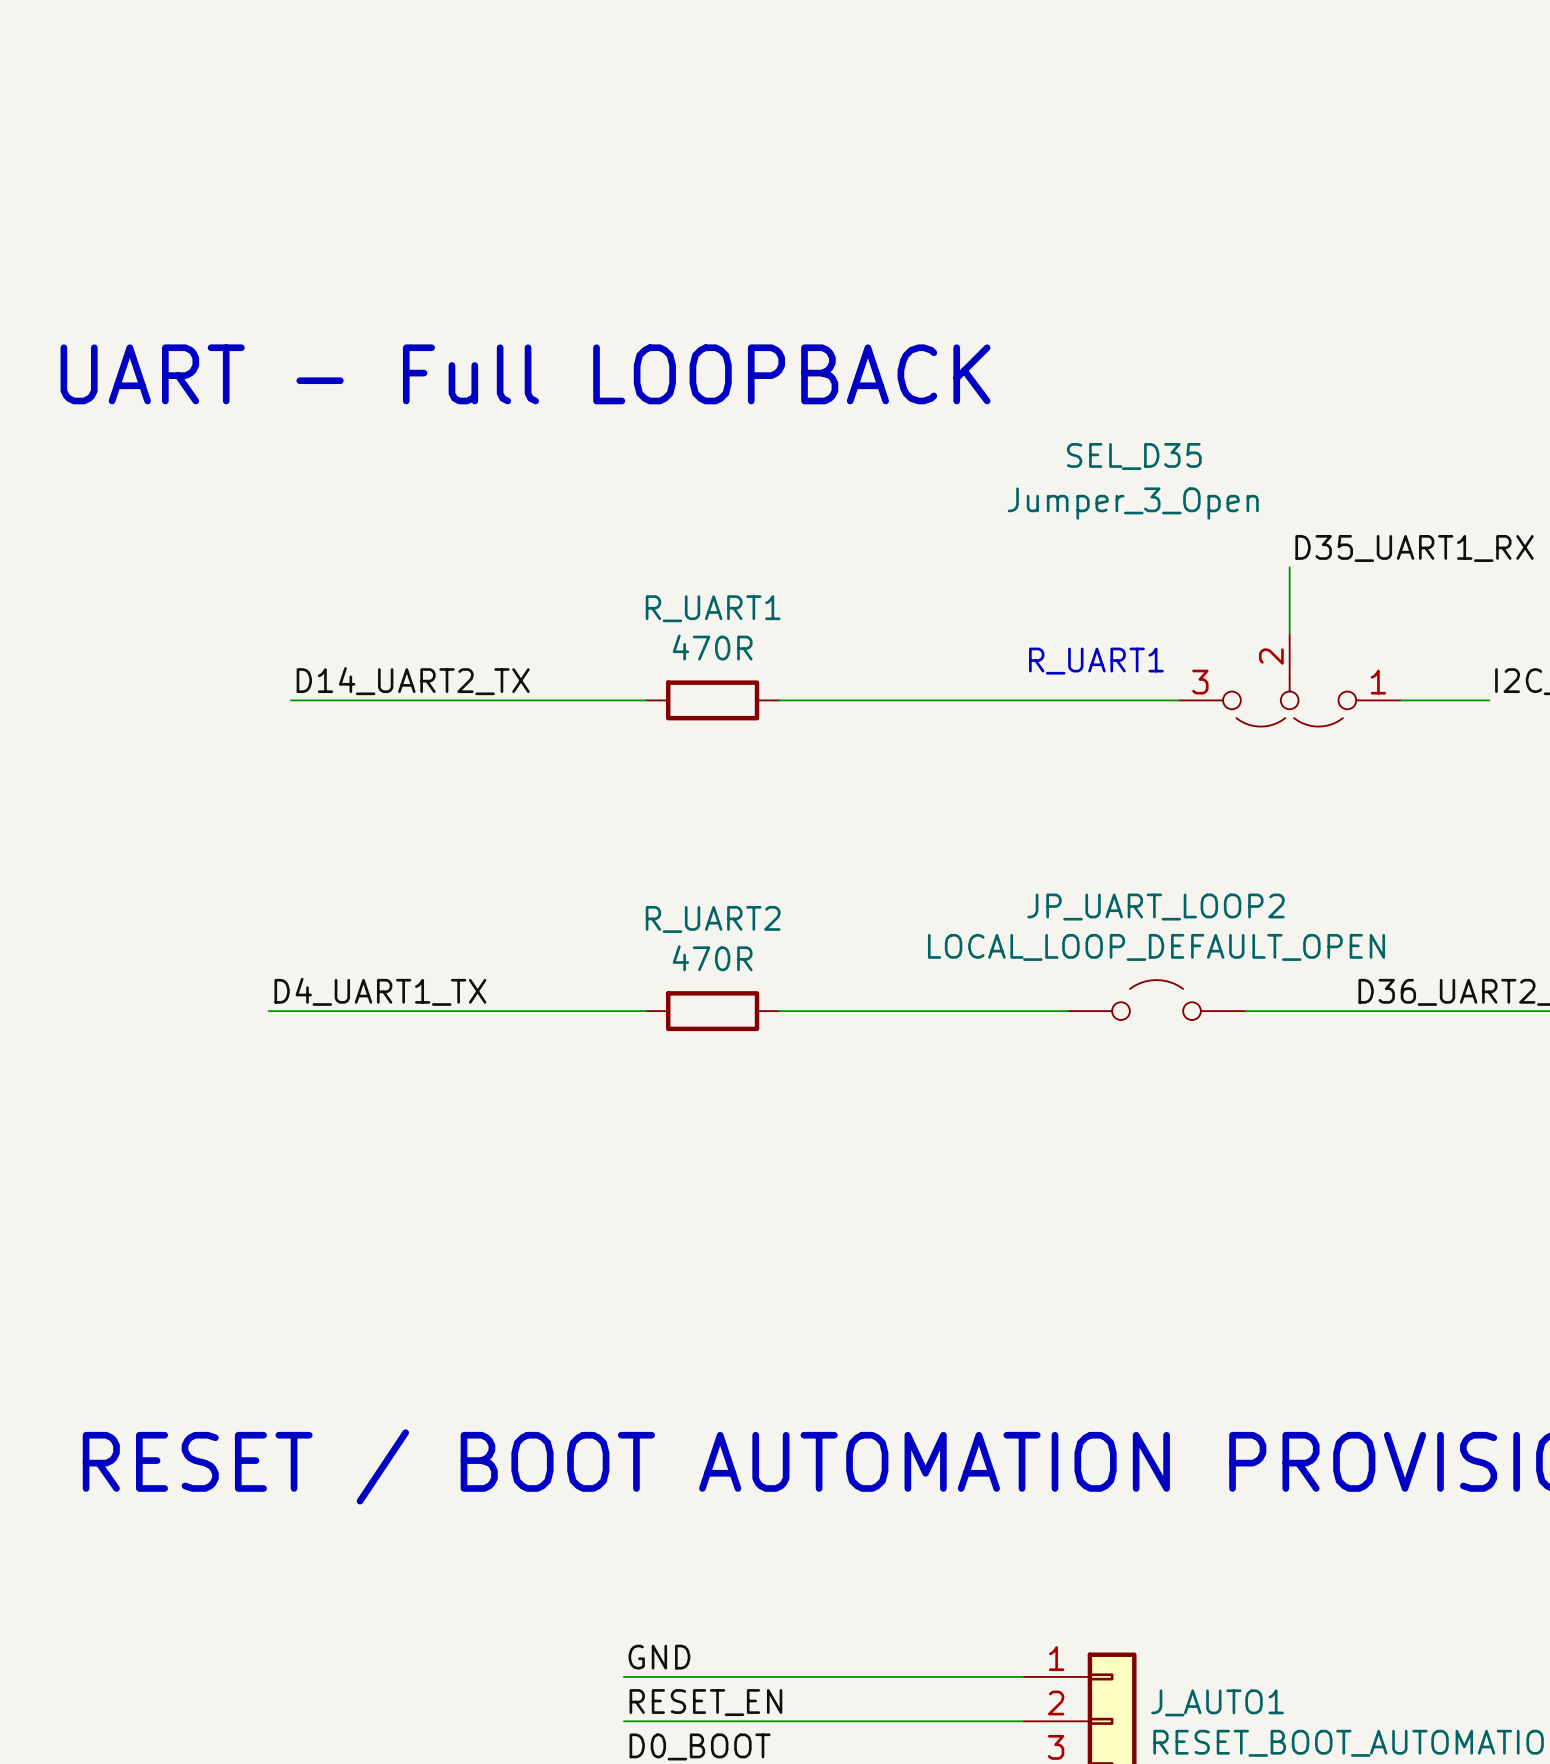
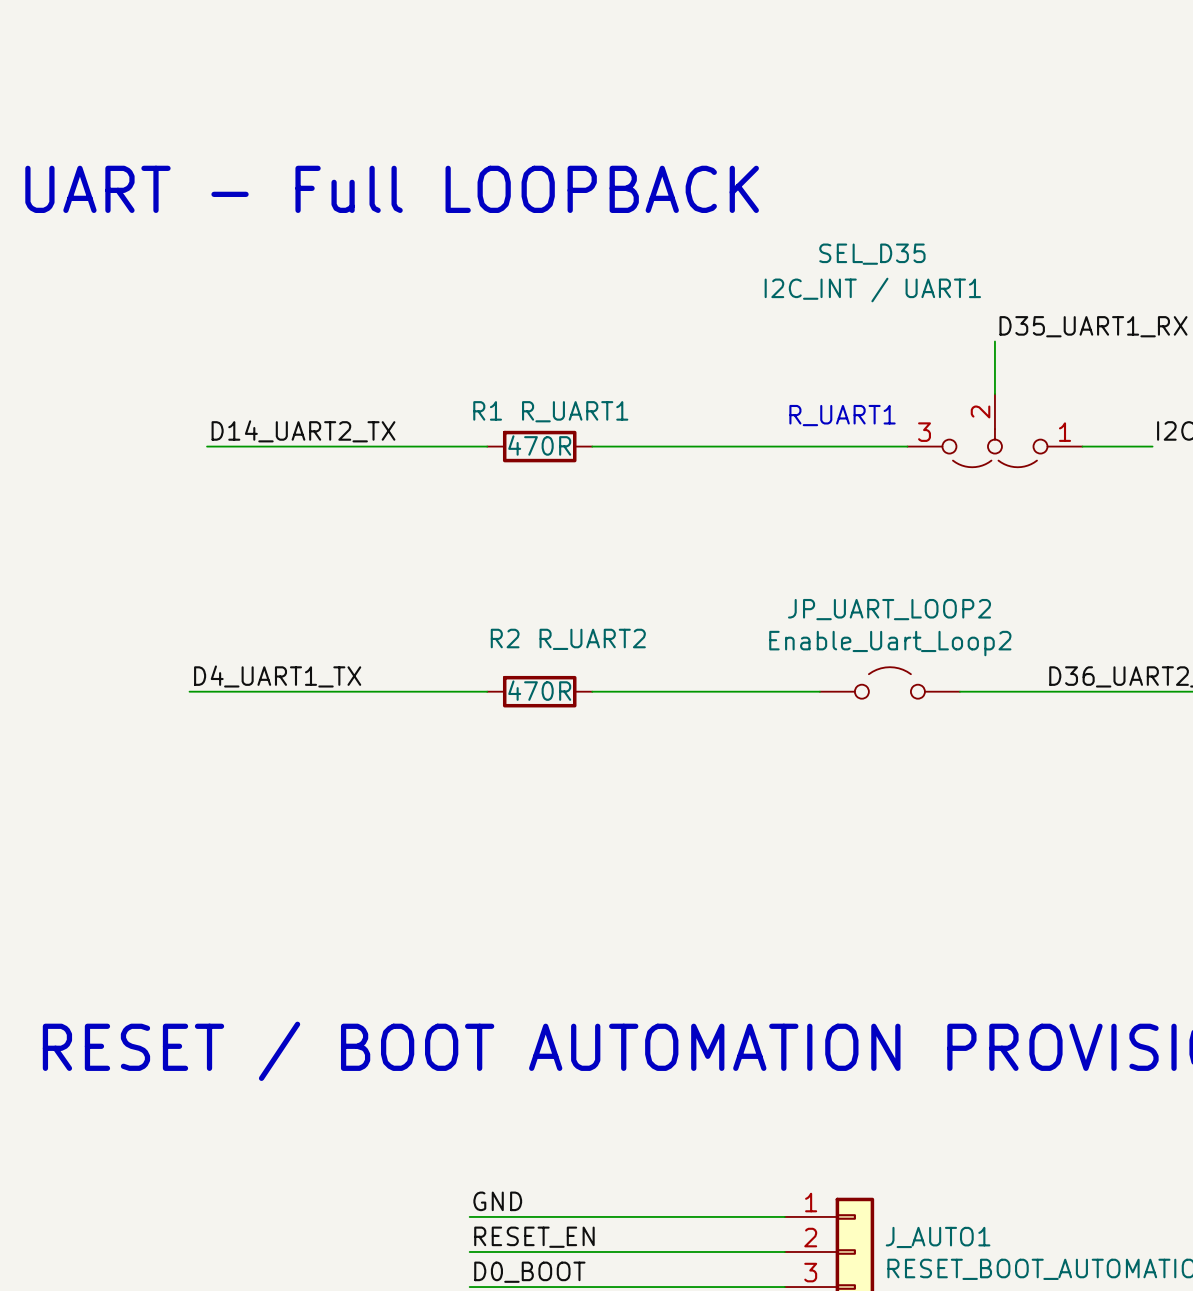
SEL_D35 value: Jumper_3_Open (1133, 503) -> I2C_INT / UART1 (872, 290)
R_UART1 name: R_UART1 (713, 608) -> R1 (487, 410)
R_UART1 value position: 470R (712, 647) -> 470R (539, 445)
R_UART1 text: none -> R_UART1 (575, 411)
R_UART2 name: R_UART2 (713, 919) -> R2 (505, 638)
R_UART2 text: none -> R_UART2 (592, 639)
JP_UART_LOOP2 value: LOCAL_LOOP_DEFAULT_OPEN (1156, 947) -> Enable_Uart_Loop2 (890, 643)
R_UART2 value position: 470R (712, 958) -> 470R (539, 690)

